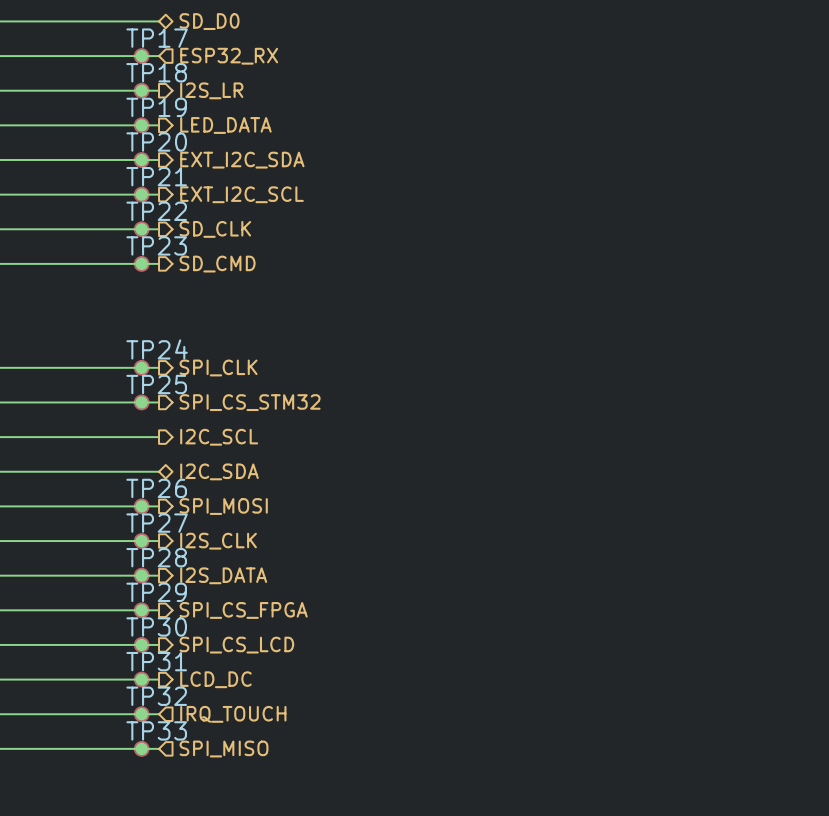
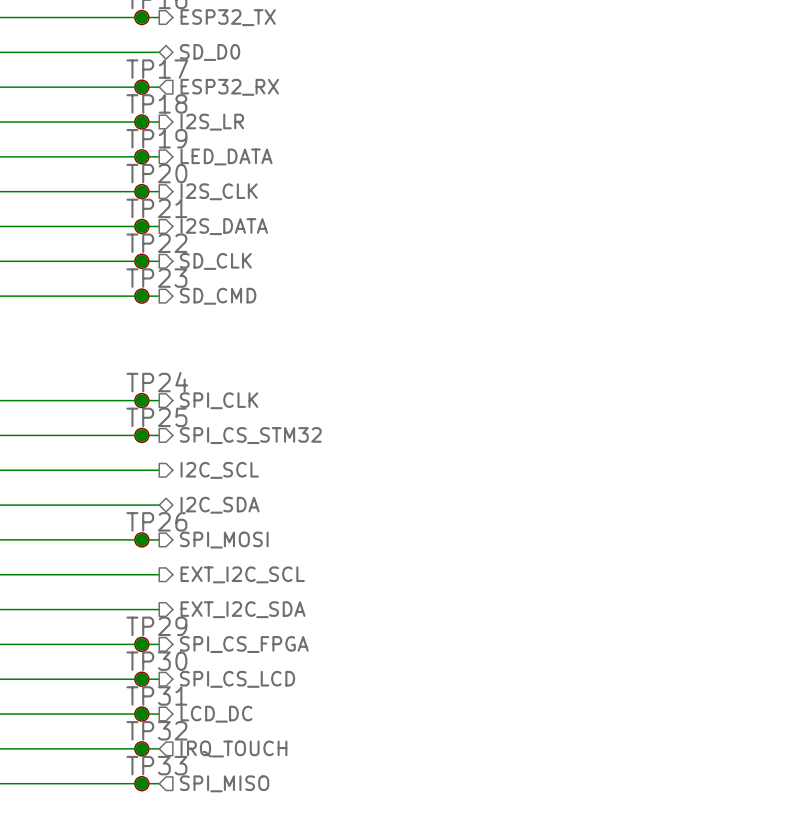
hierarchical label: EXT_I2C_SDA (242, 160) -> I2S_CLK (219, 191)
hierarchical label: EXT_I2C_SCL (242, 194) -> I2S_DATA (224, 226)
TP27: (141, 541) -> none
junction: (141, 541) -> none
hierarchical label: I2S_CLK (218, 541) -> EXT_I2C_SCL (242, 574)
TP28: (141, 575) -> none
junction: (141, 575) -> none
hierarchical label: I2S_DATA (223, 575) -> EXT_I2C_SDA (243, 609)

